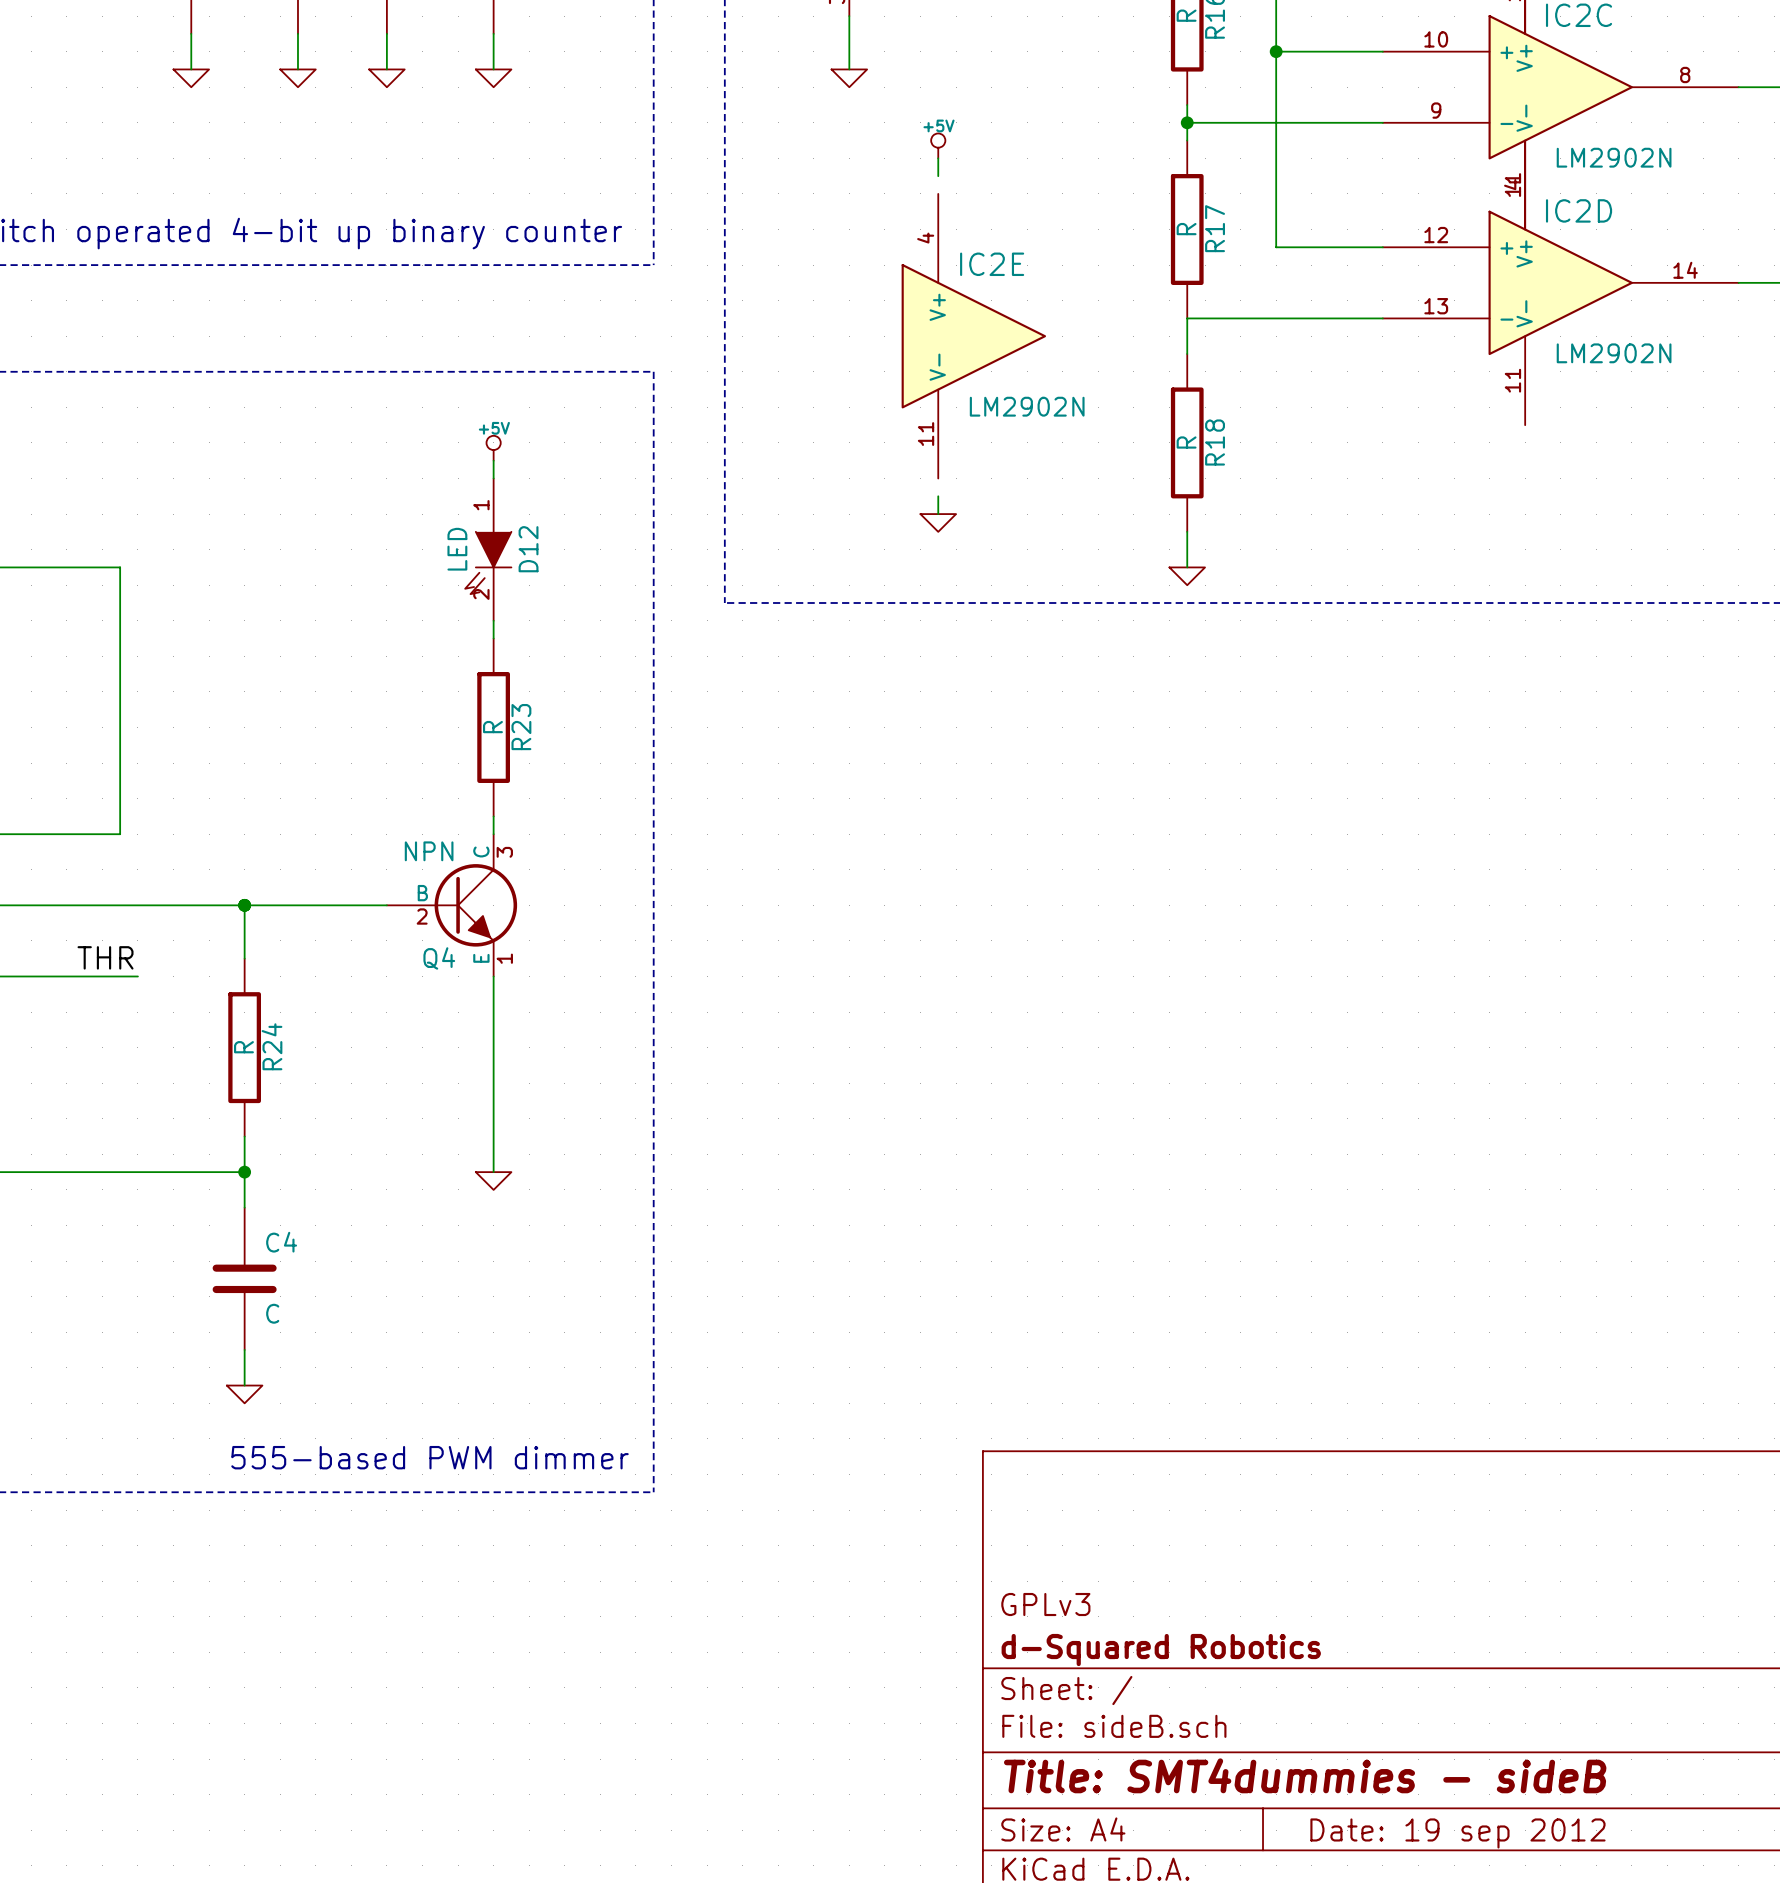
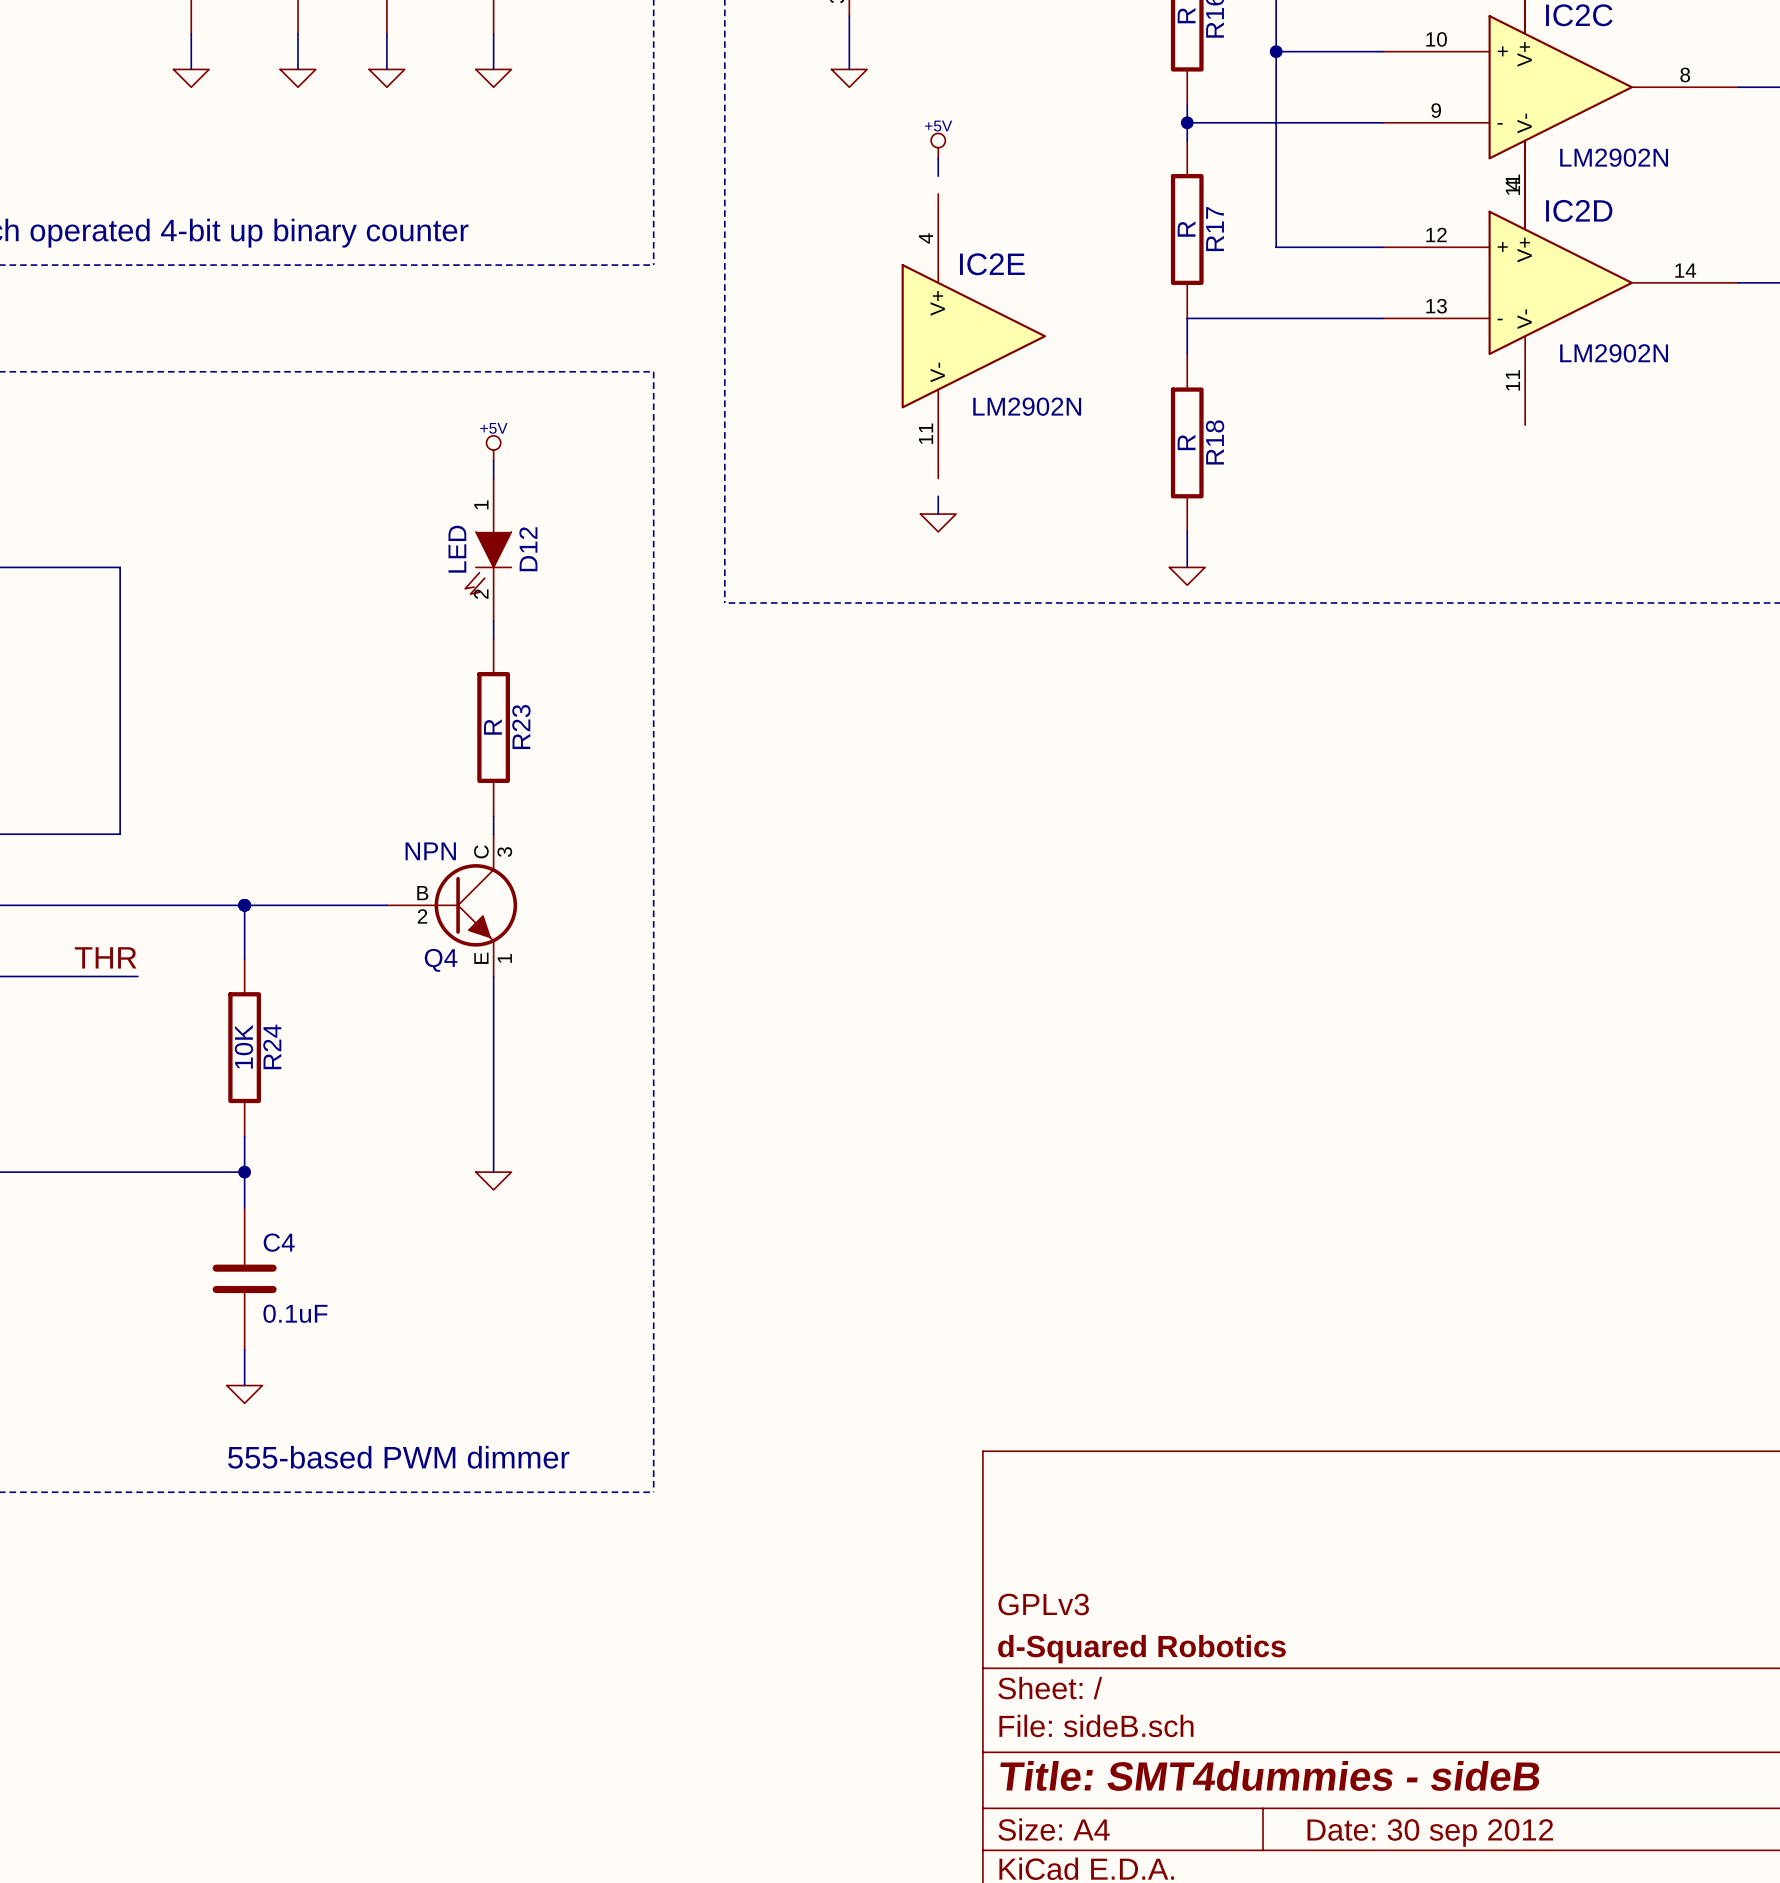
R24 value: R (243, 1047) -> 10K (243, 1046)
C4 value: C (272, 1313) -> 0.1uF (295, 1313)
title block: Date: 19 sep 2012 (1457, 1833) -> Date: 30 sep 2012 (1430, 1832)

